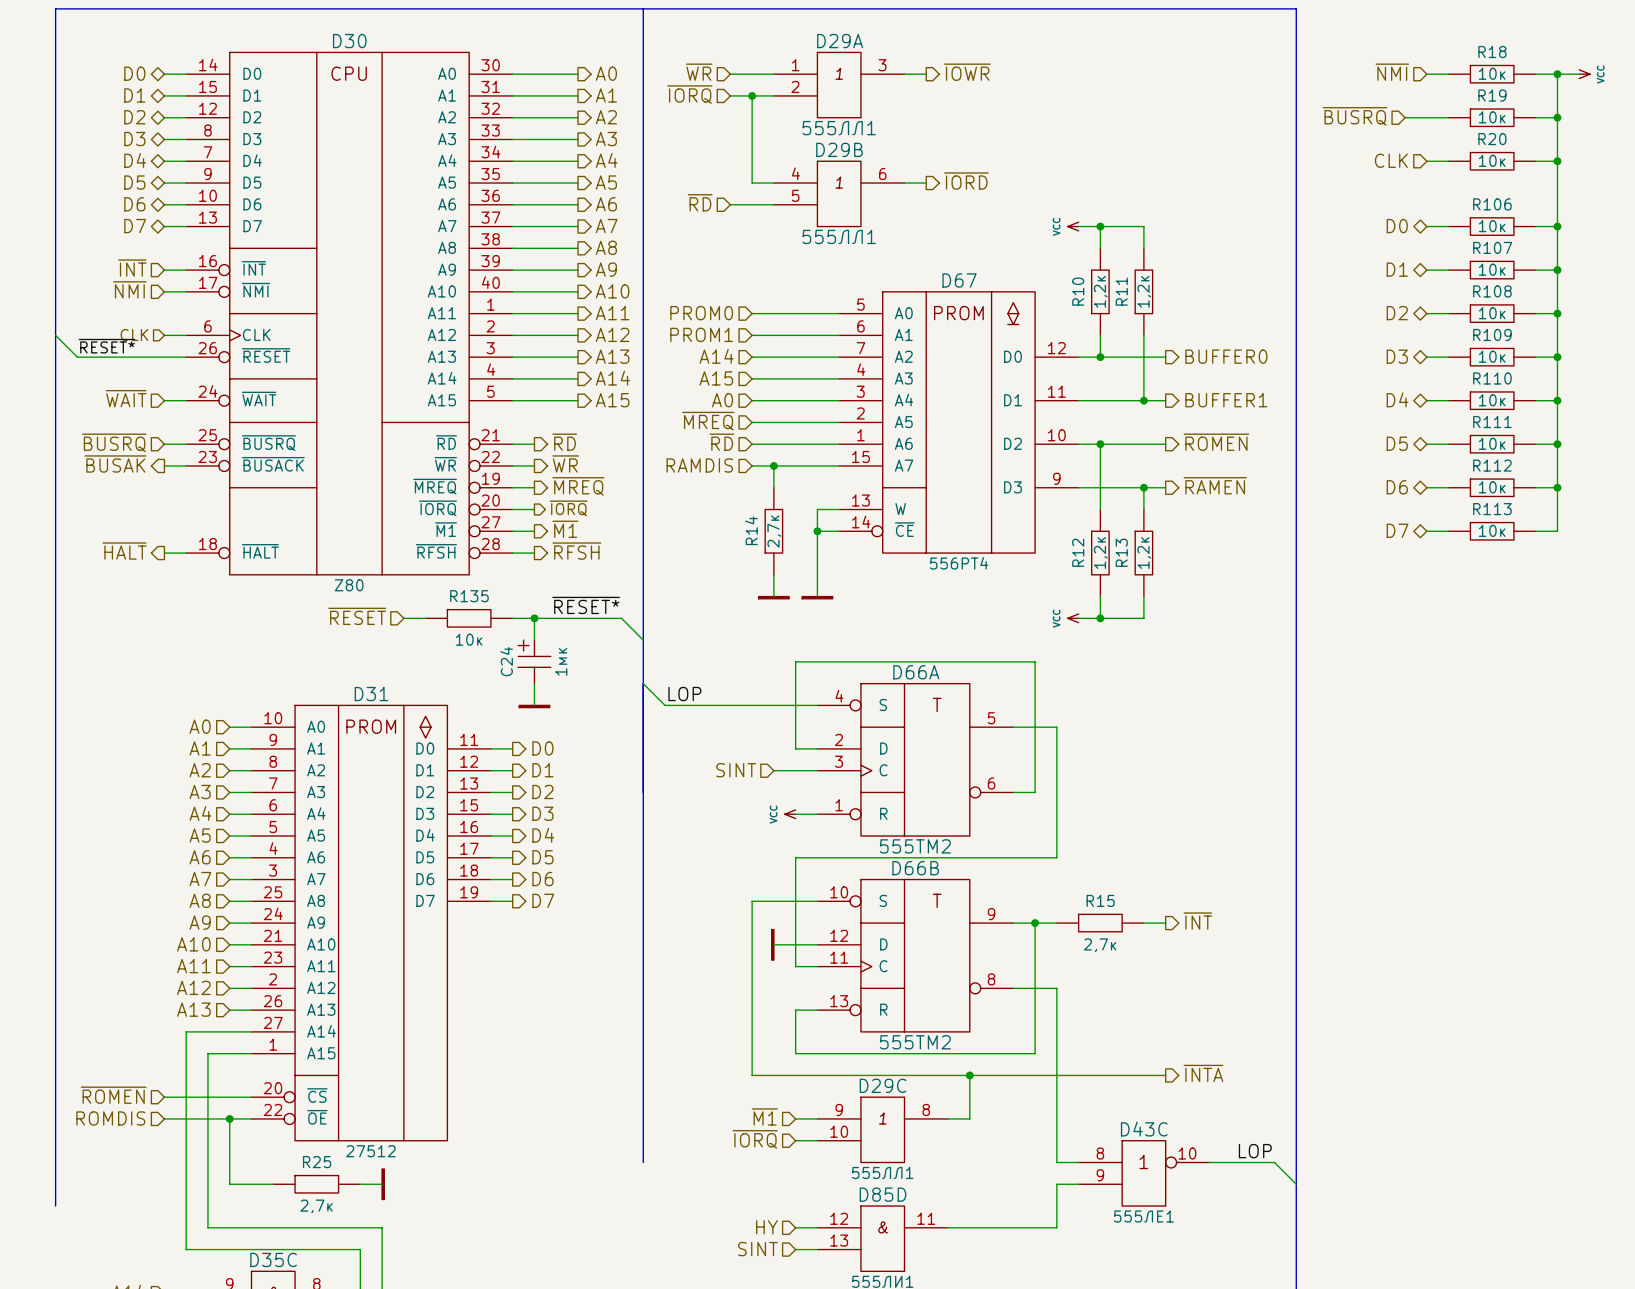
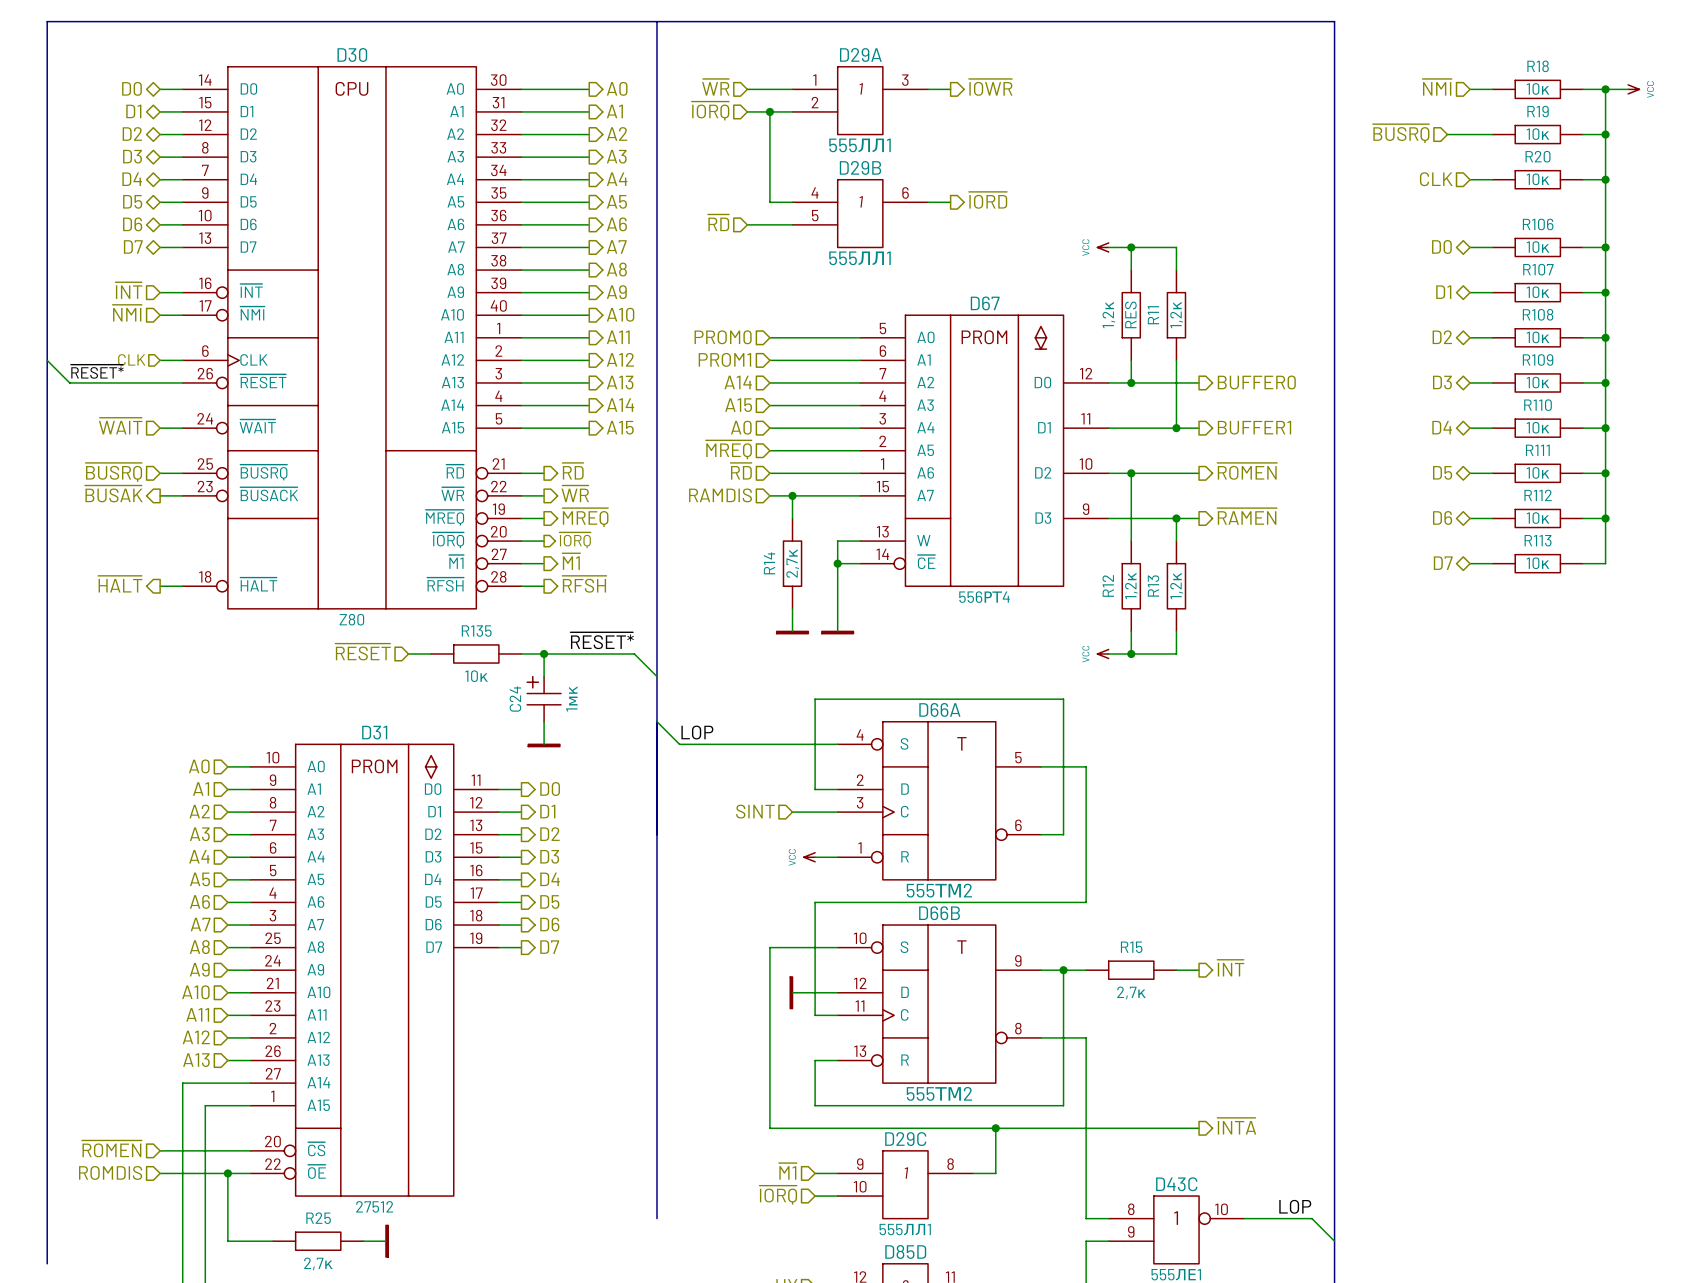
R10 name: R10 (1078, 291) -> 1,2к (1108, 315)
R10 value: 1,2к (1100, 291) -> RES (1130, 314)

